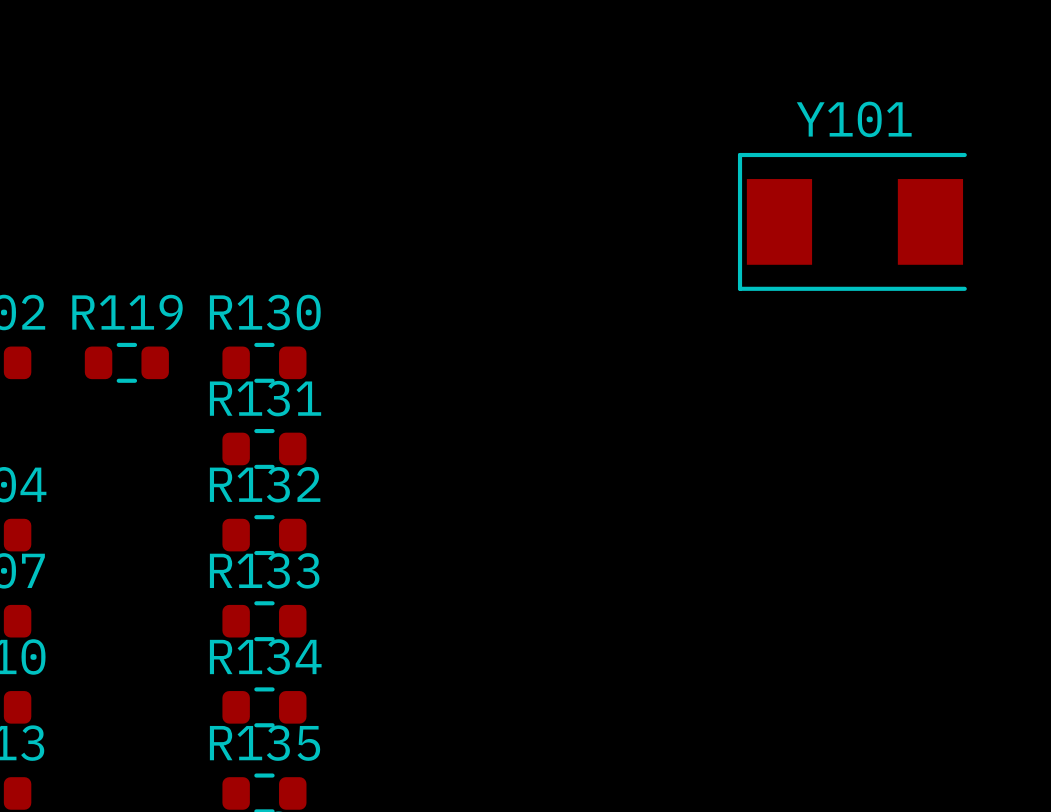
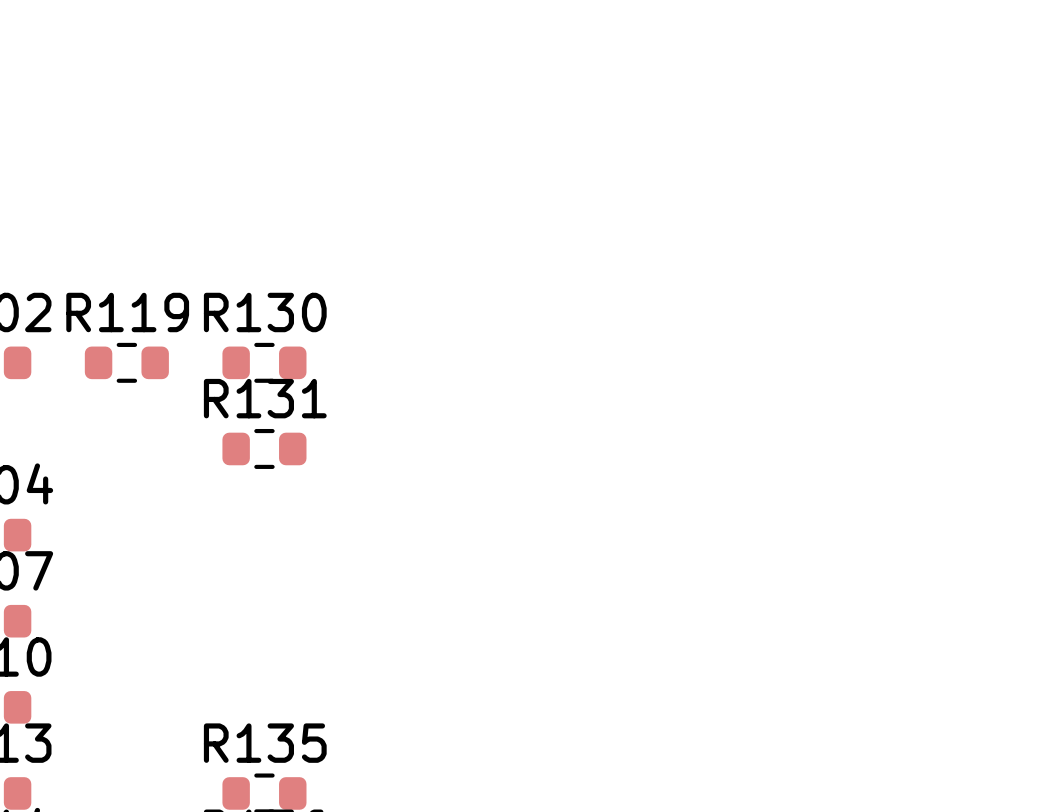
Y101: (852, 221) -> none
R132: (264, 535) -> none
R133: (264, 621) -> none
R134: (264, 707) -> none

